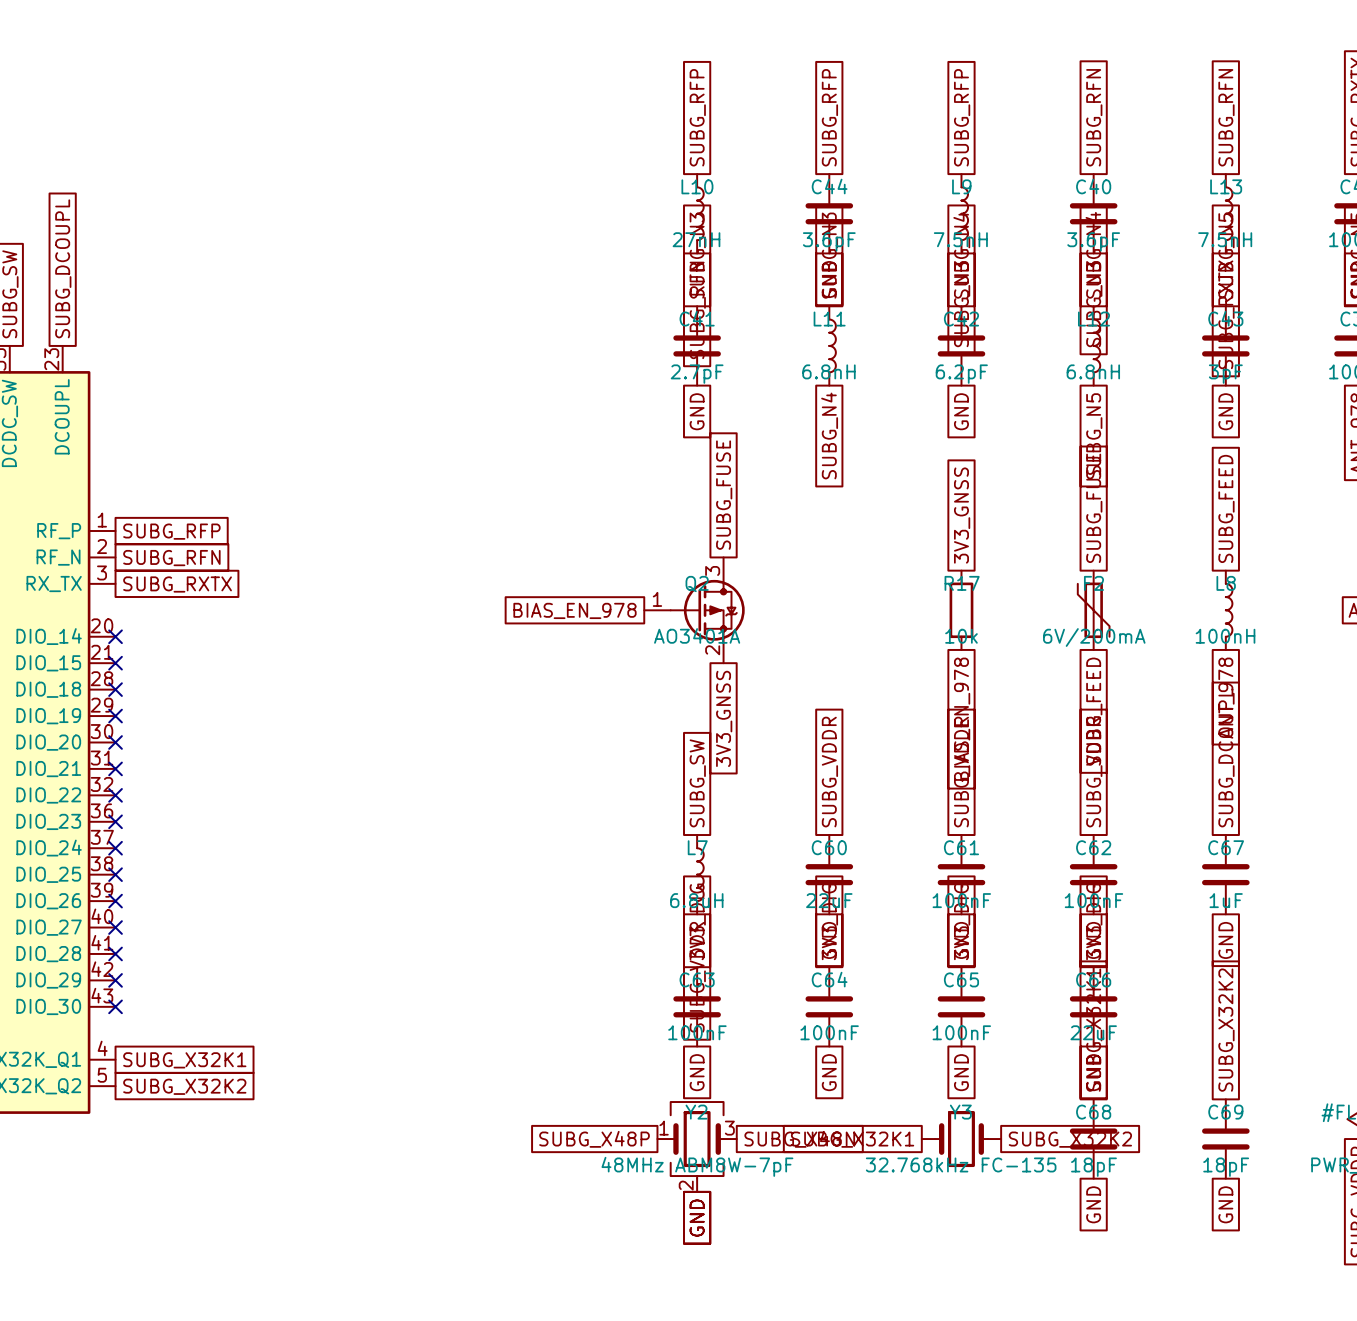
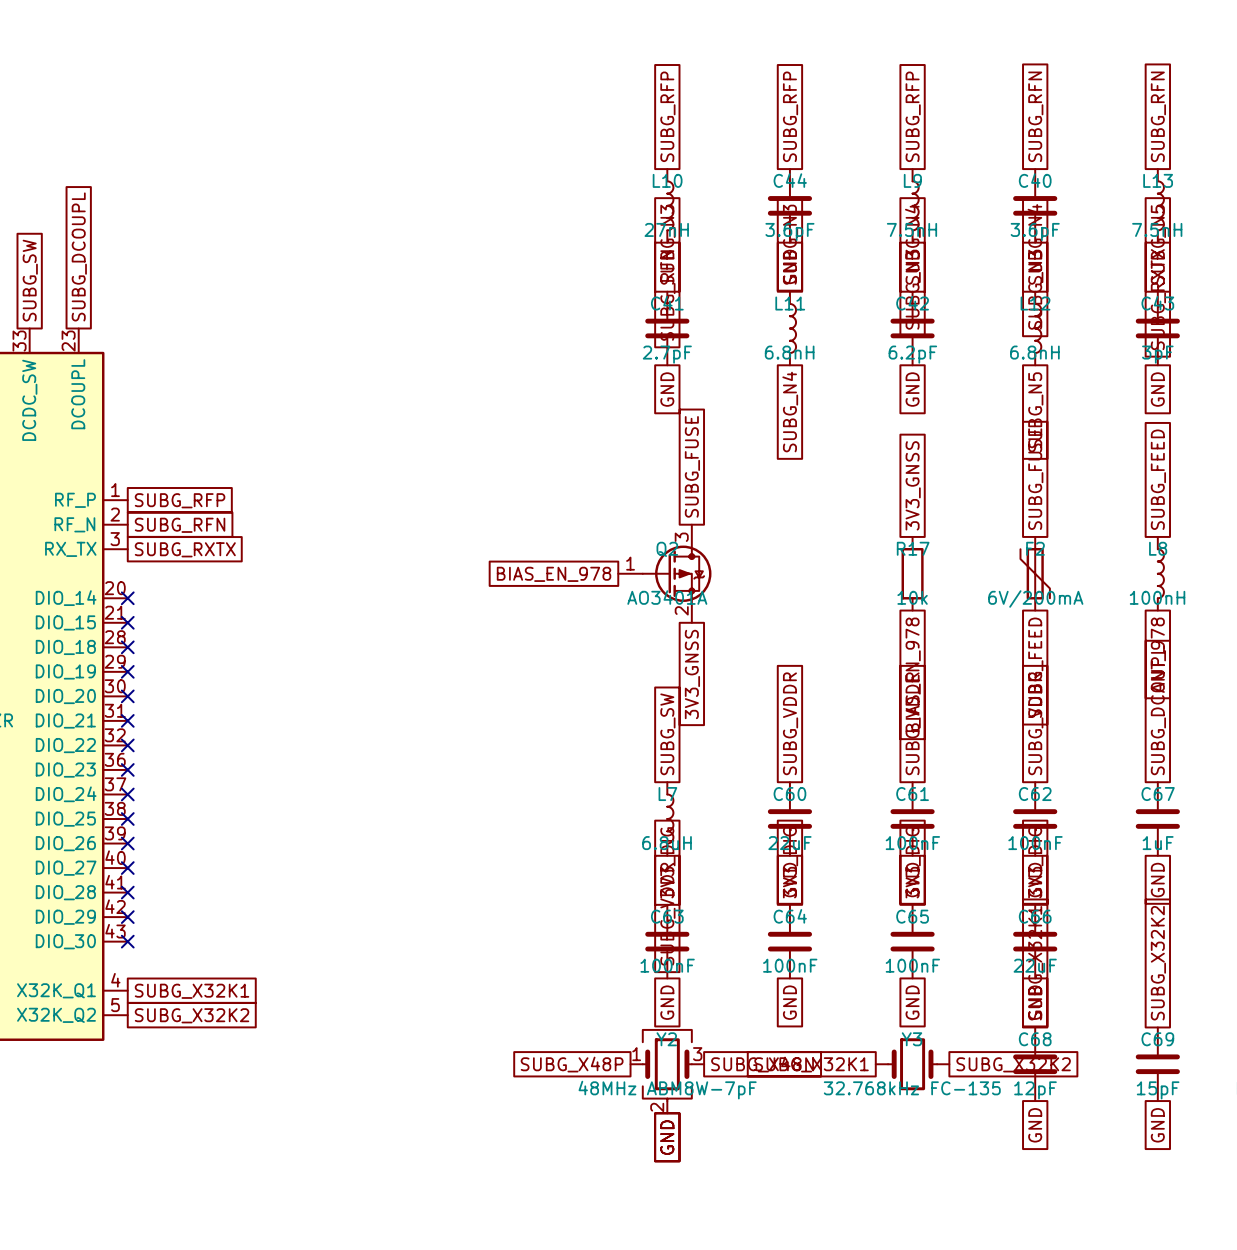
C68 value: 18pF (1093, 1167) -> 12pF (1035, 1090)
C69 value: 18pF (1226, 1167) -> 15pF (1158, 1090)

